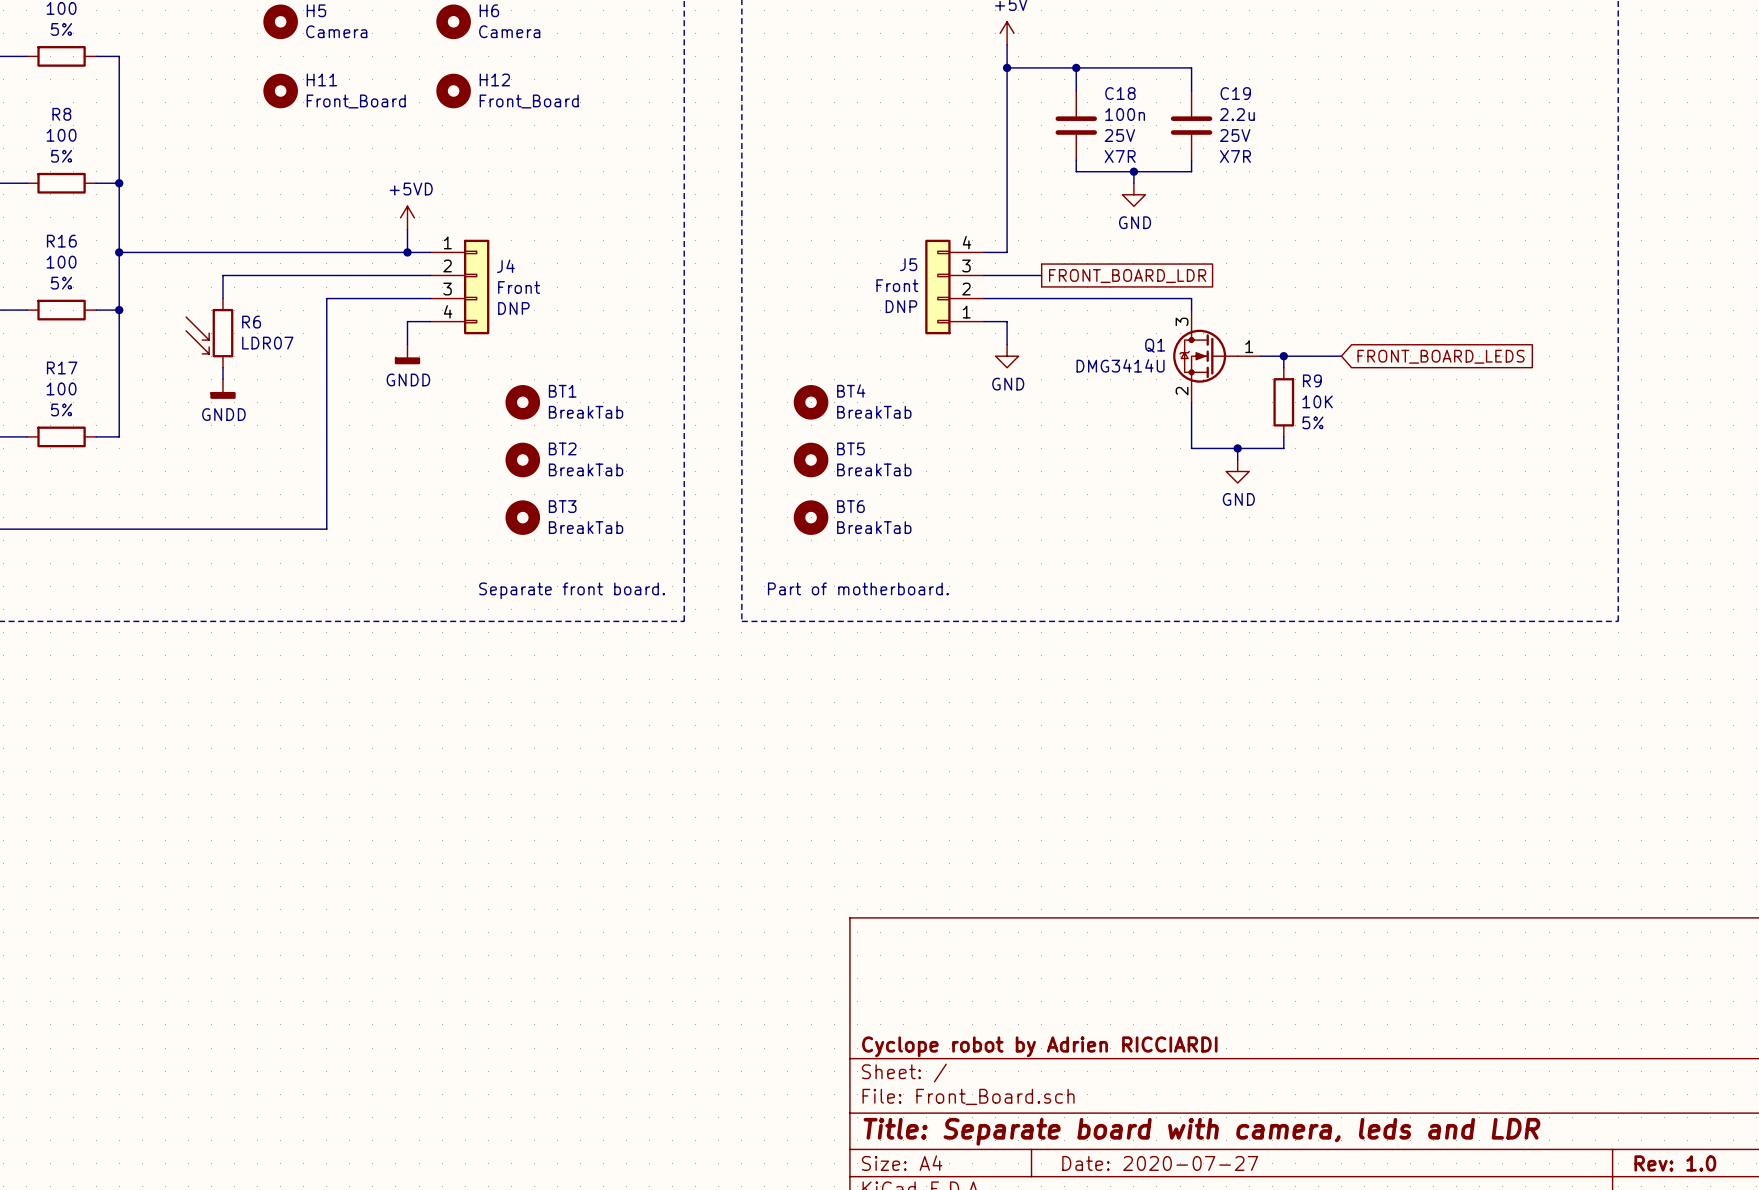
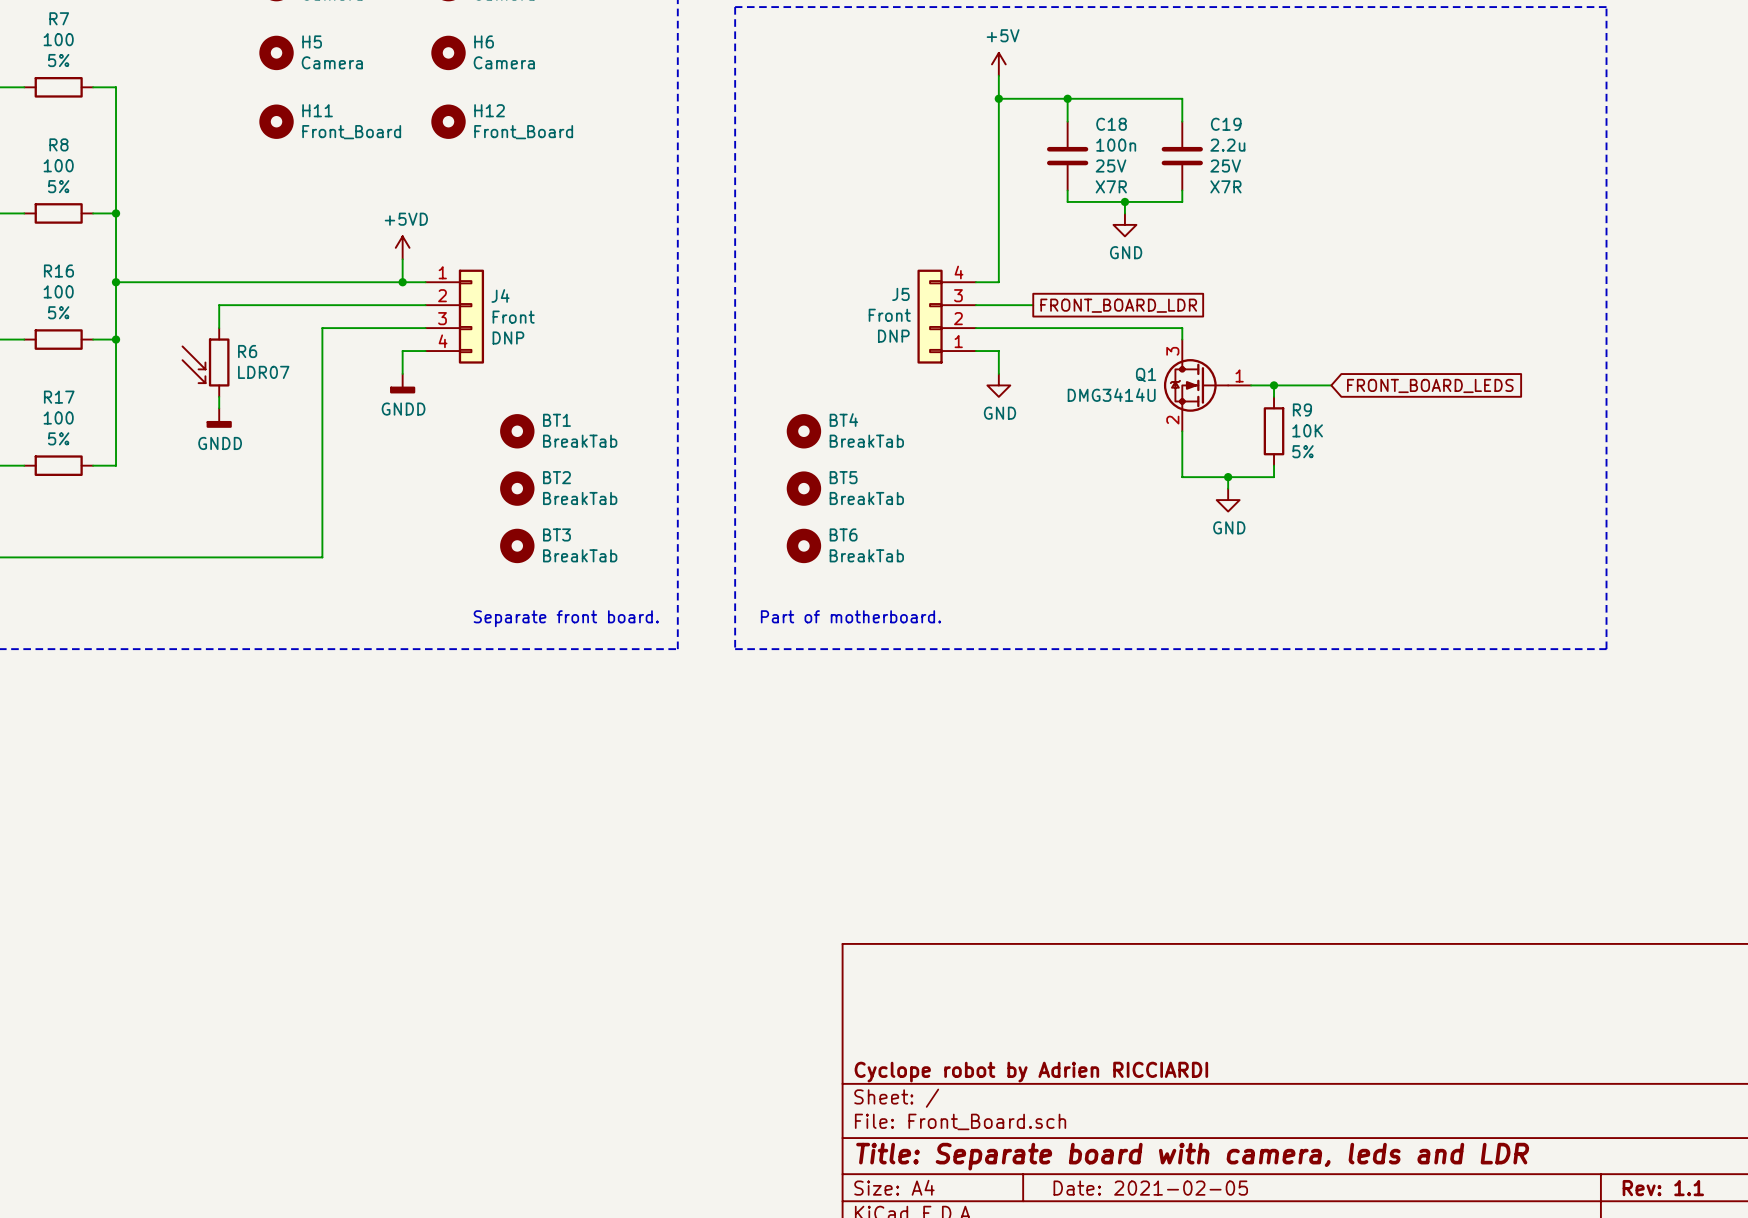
title block: Date: 2020-07-27 (1160, 1163) -> Date: 2021-02-05 (1150, 1188)
title block: Rev: 1.0 (1675, 1163) -> Rev: 1.1 (1663, 1188)

